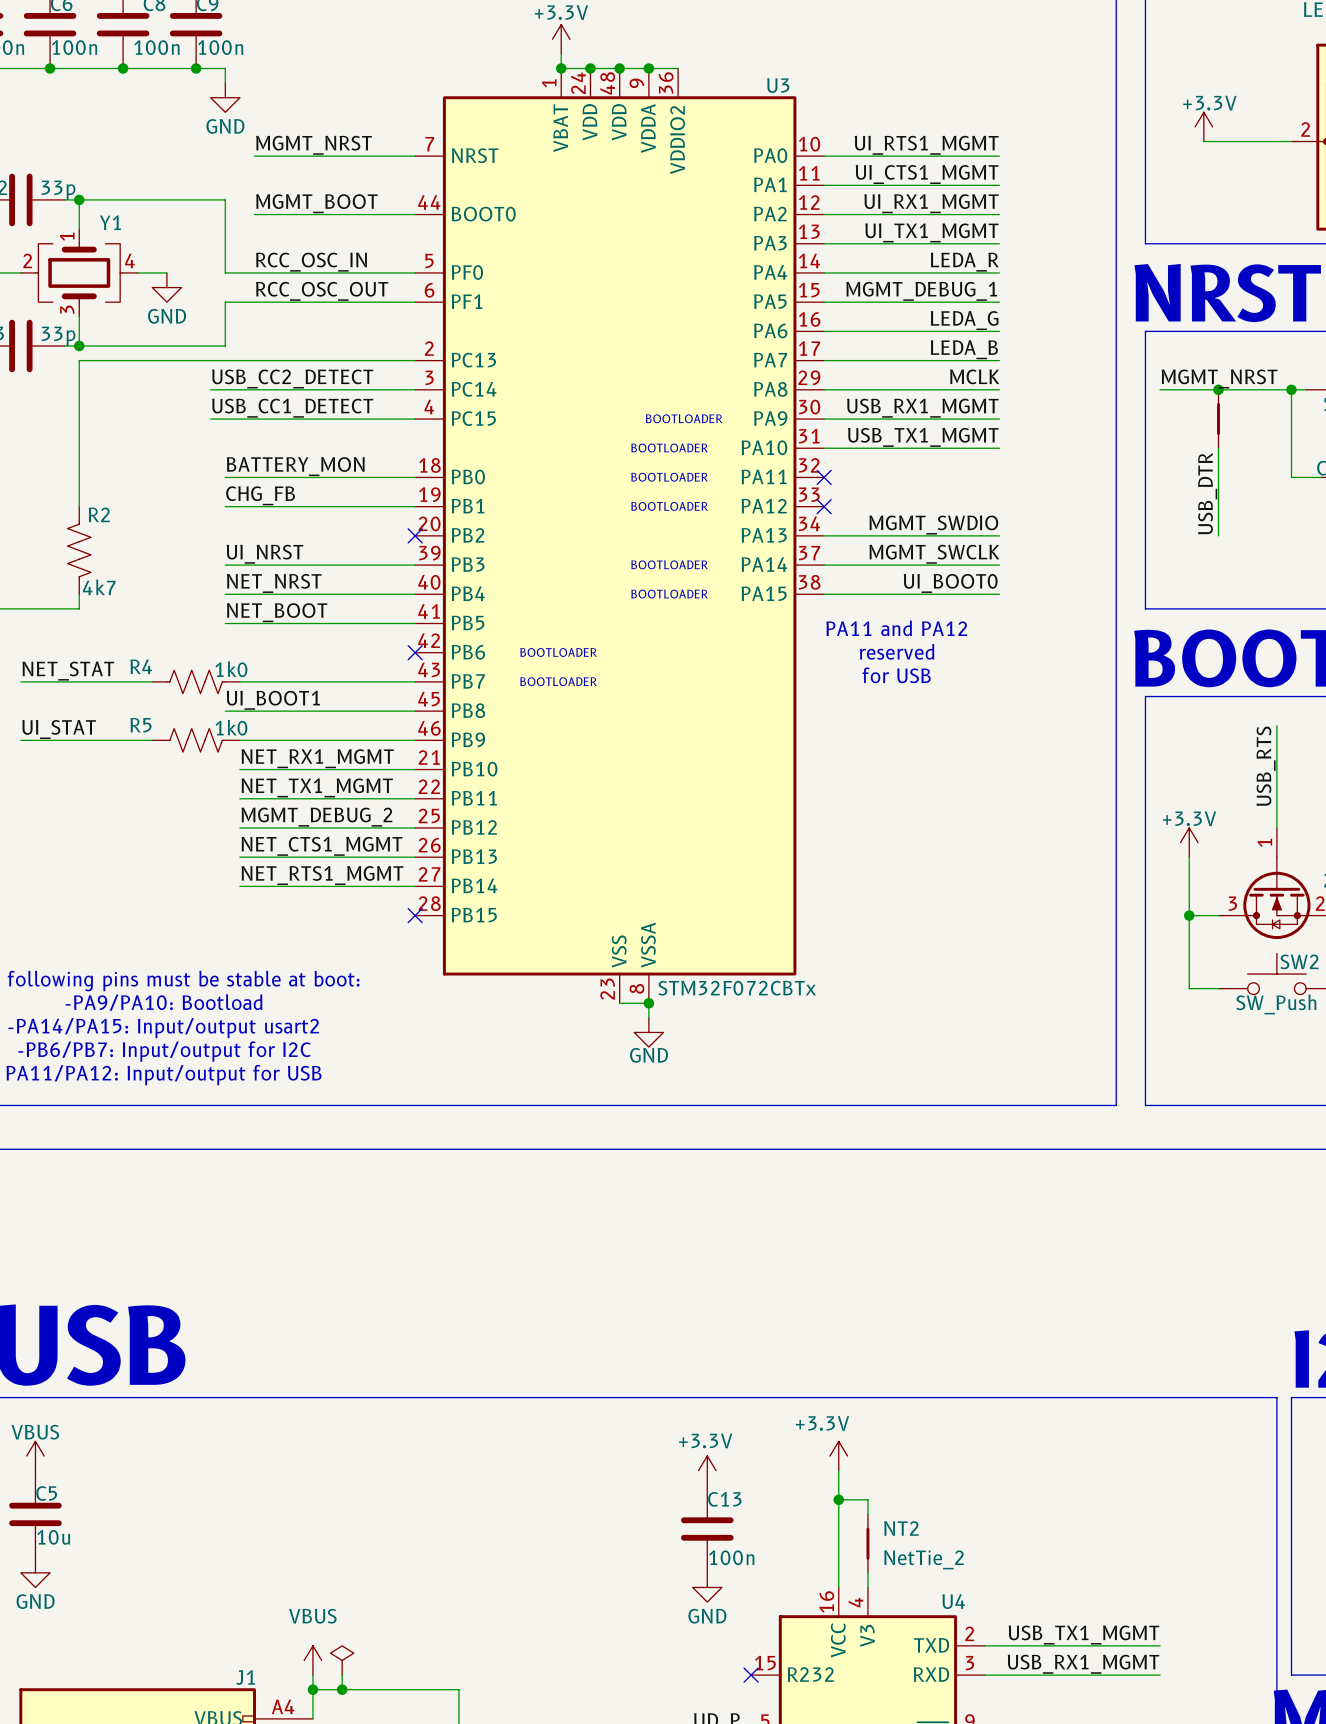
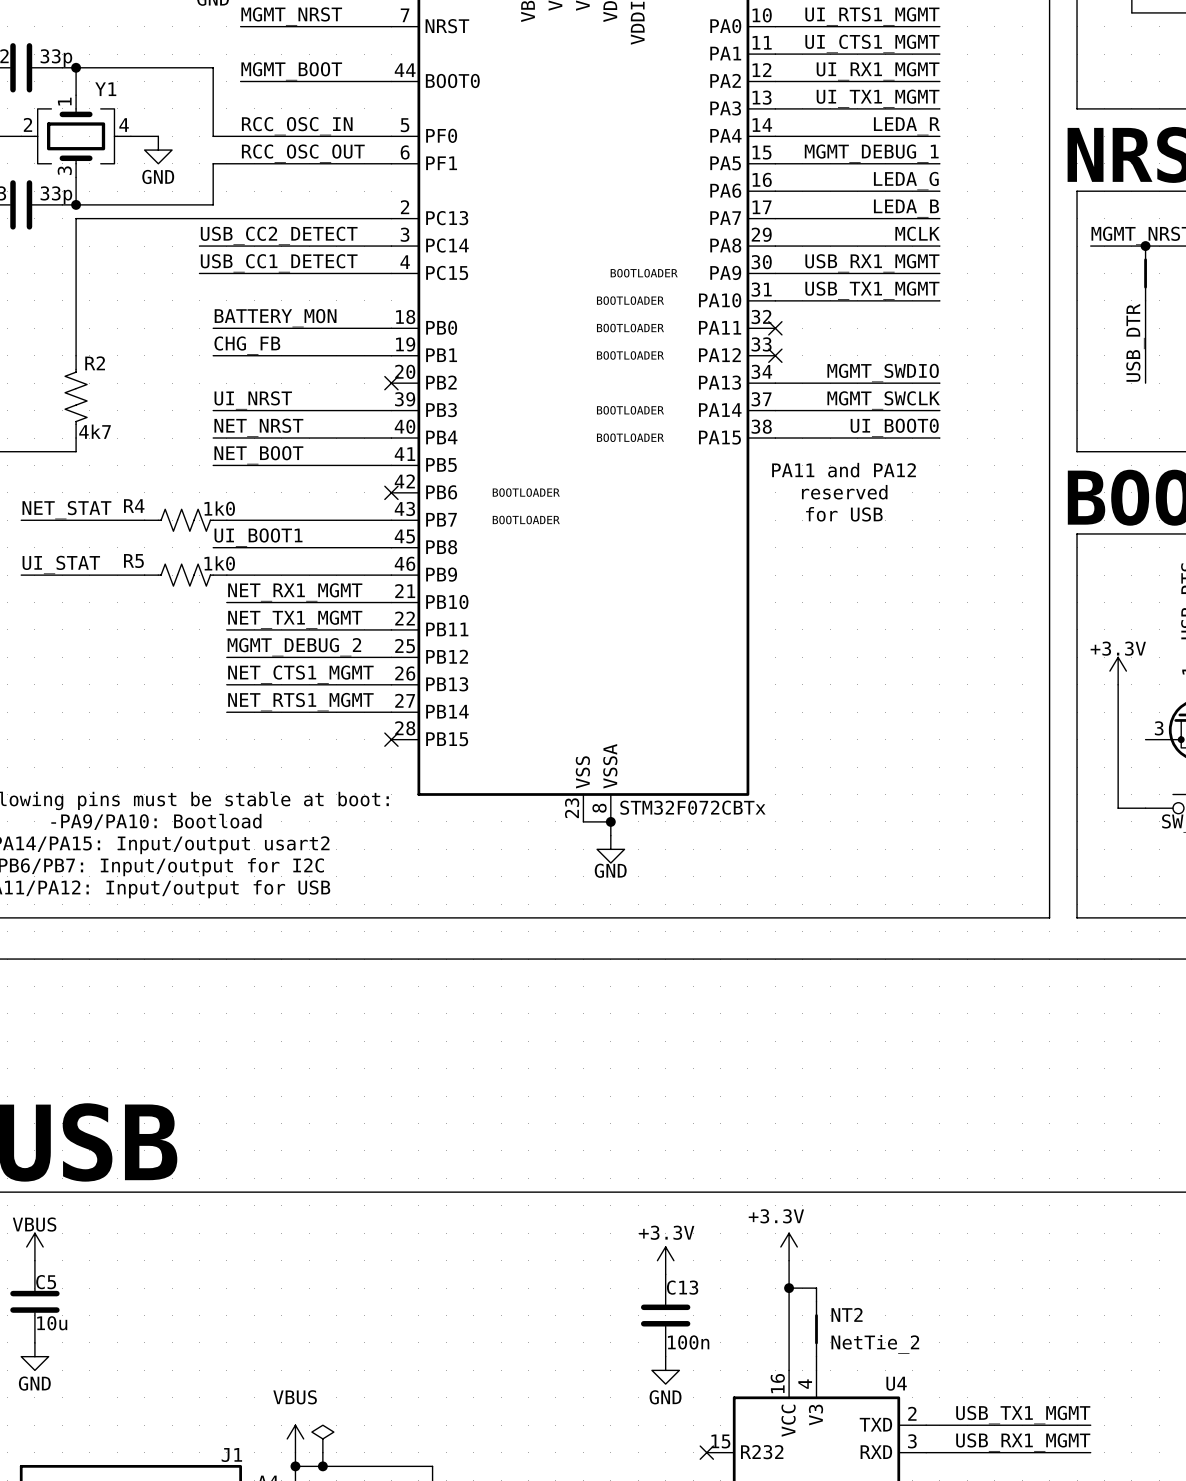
wire: (1189, 915) (1218, 915) -> none
junction: (1189, 915) -> none

